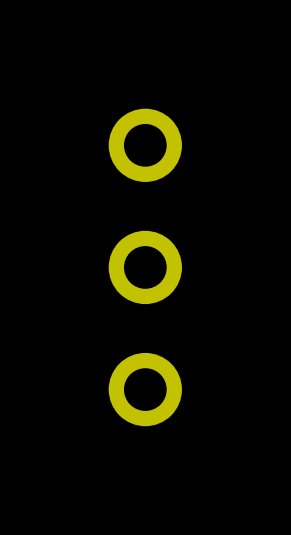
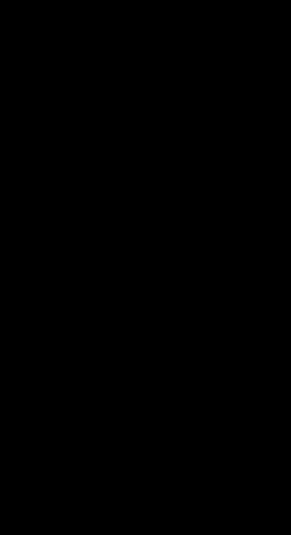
part: (145, 267) -> none

